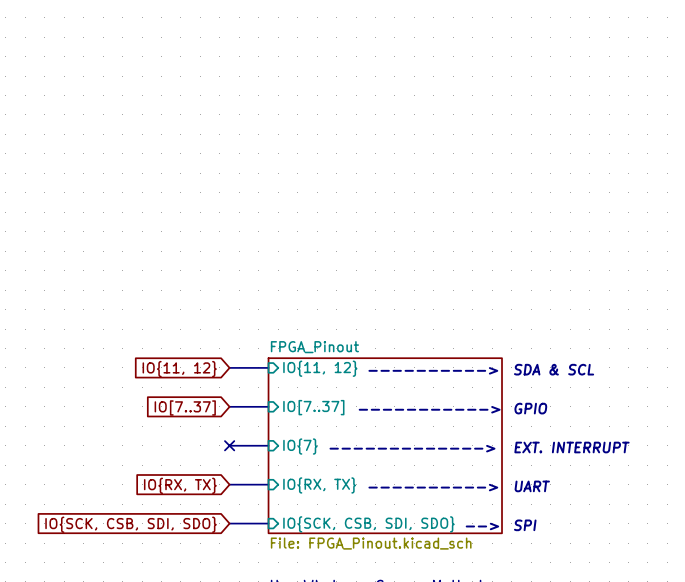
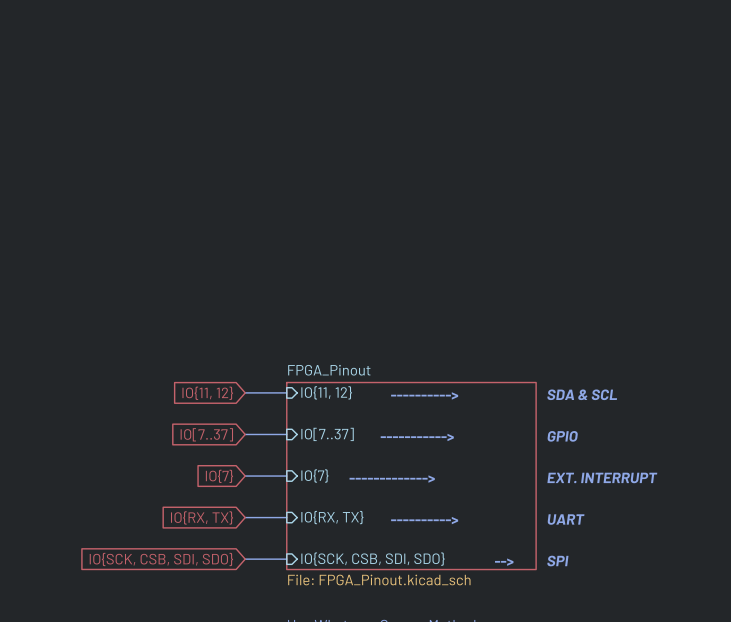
no-connect mark: (229, 445) -> none
global label: none -> IO{7} (219, 476)

